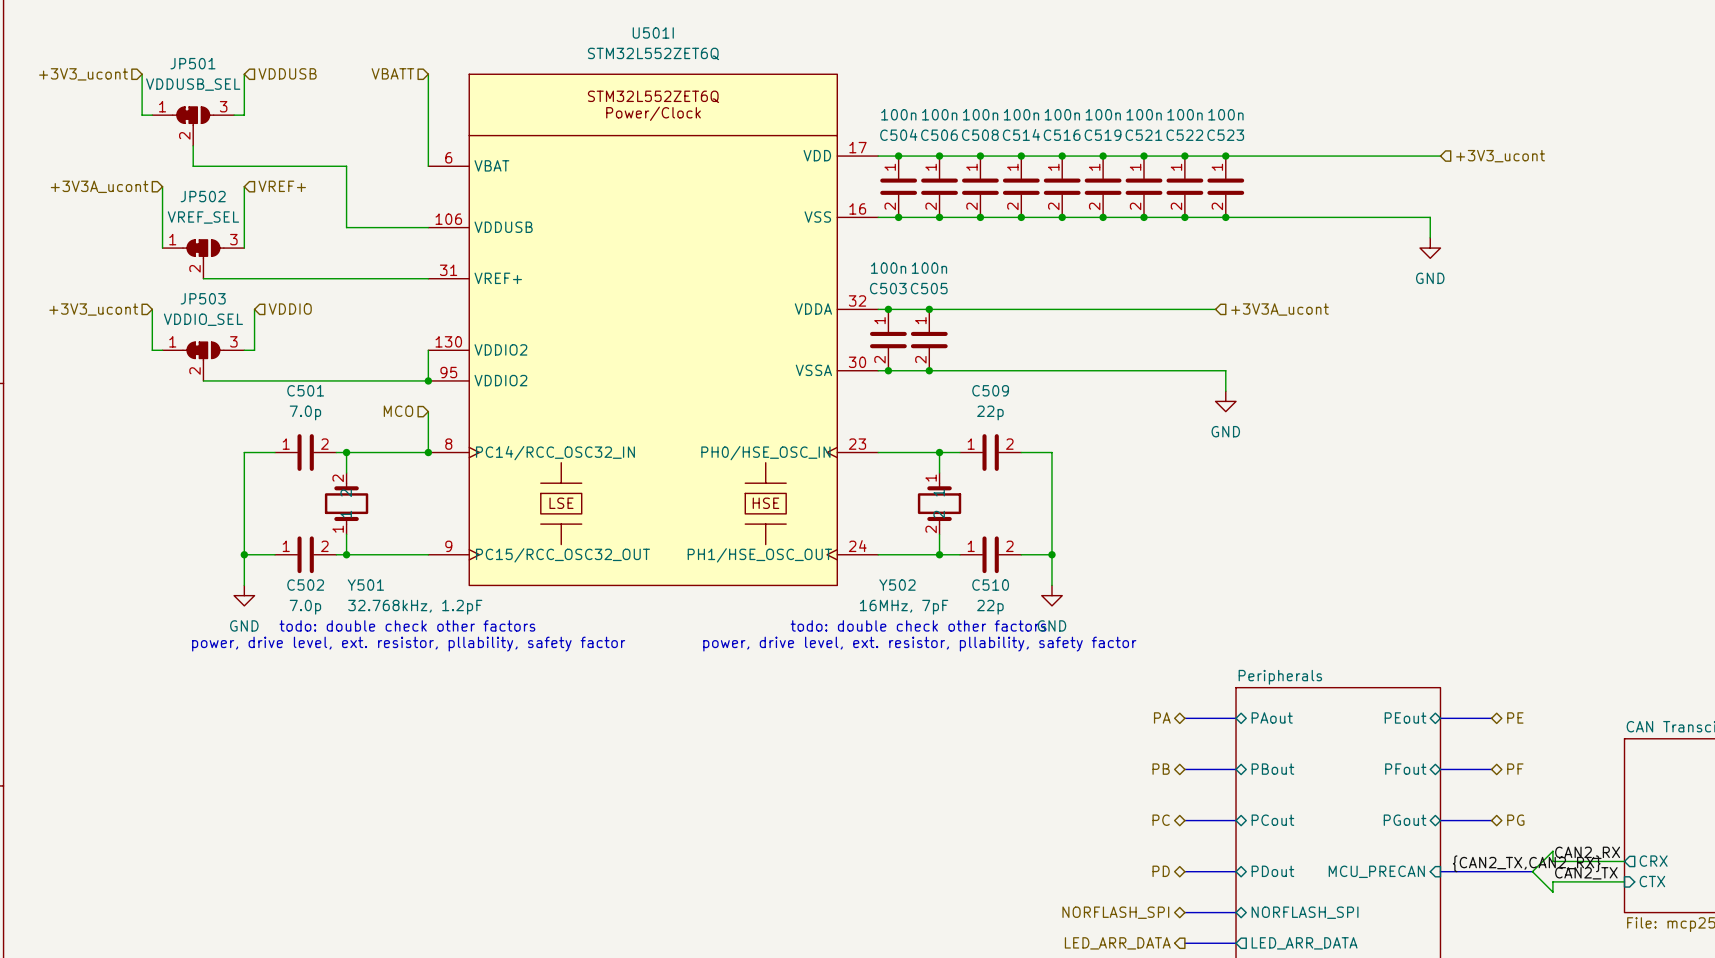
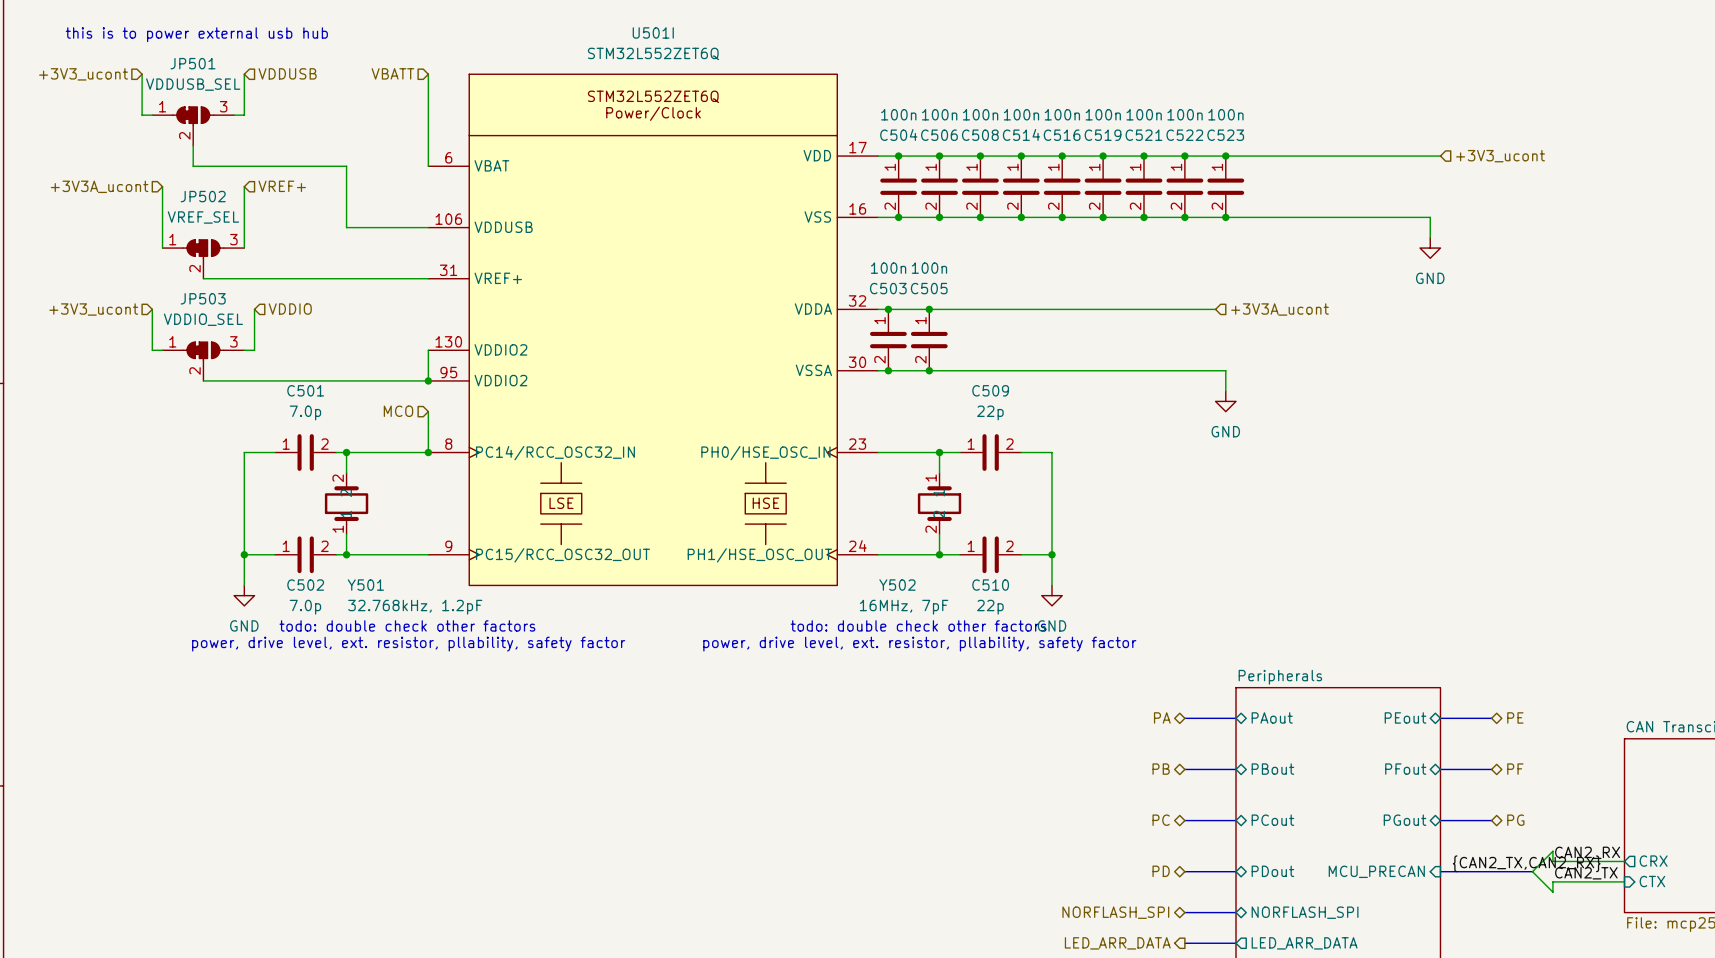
text: none -> this is to power external usb hub (196, 34)

